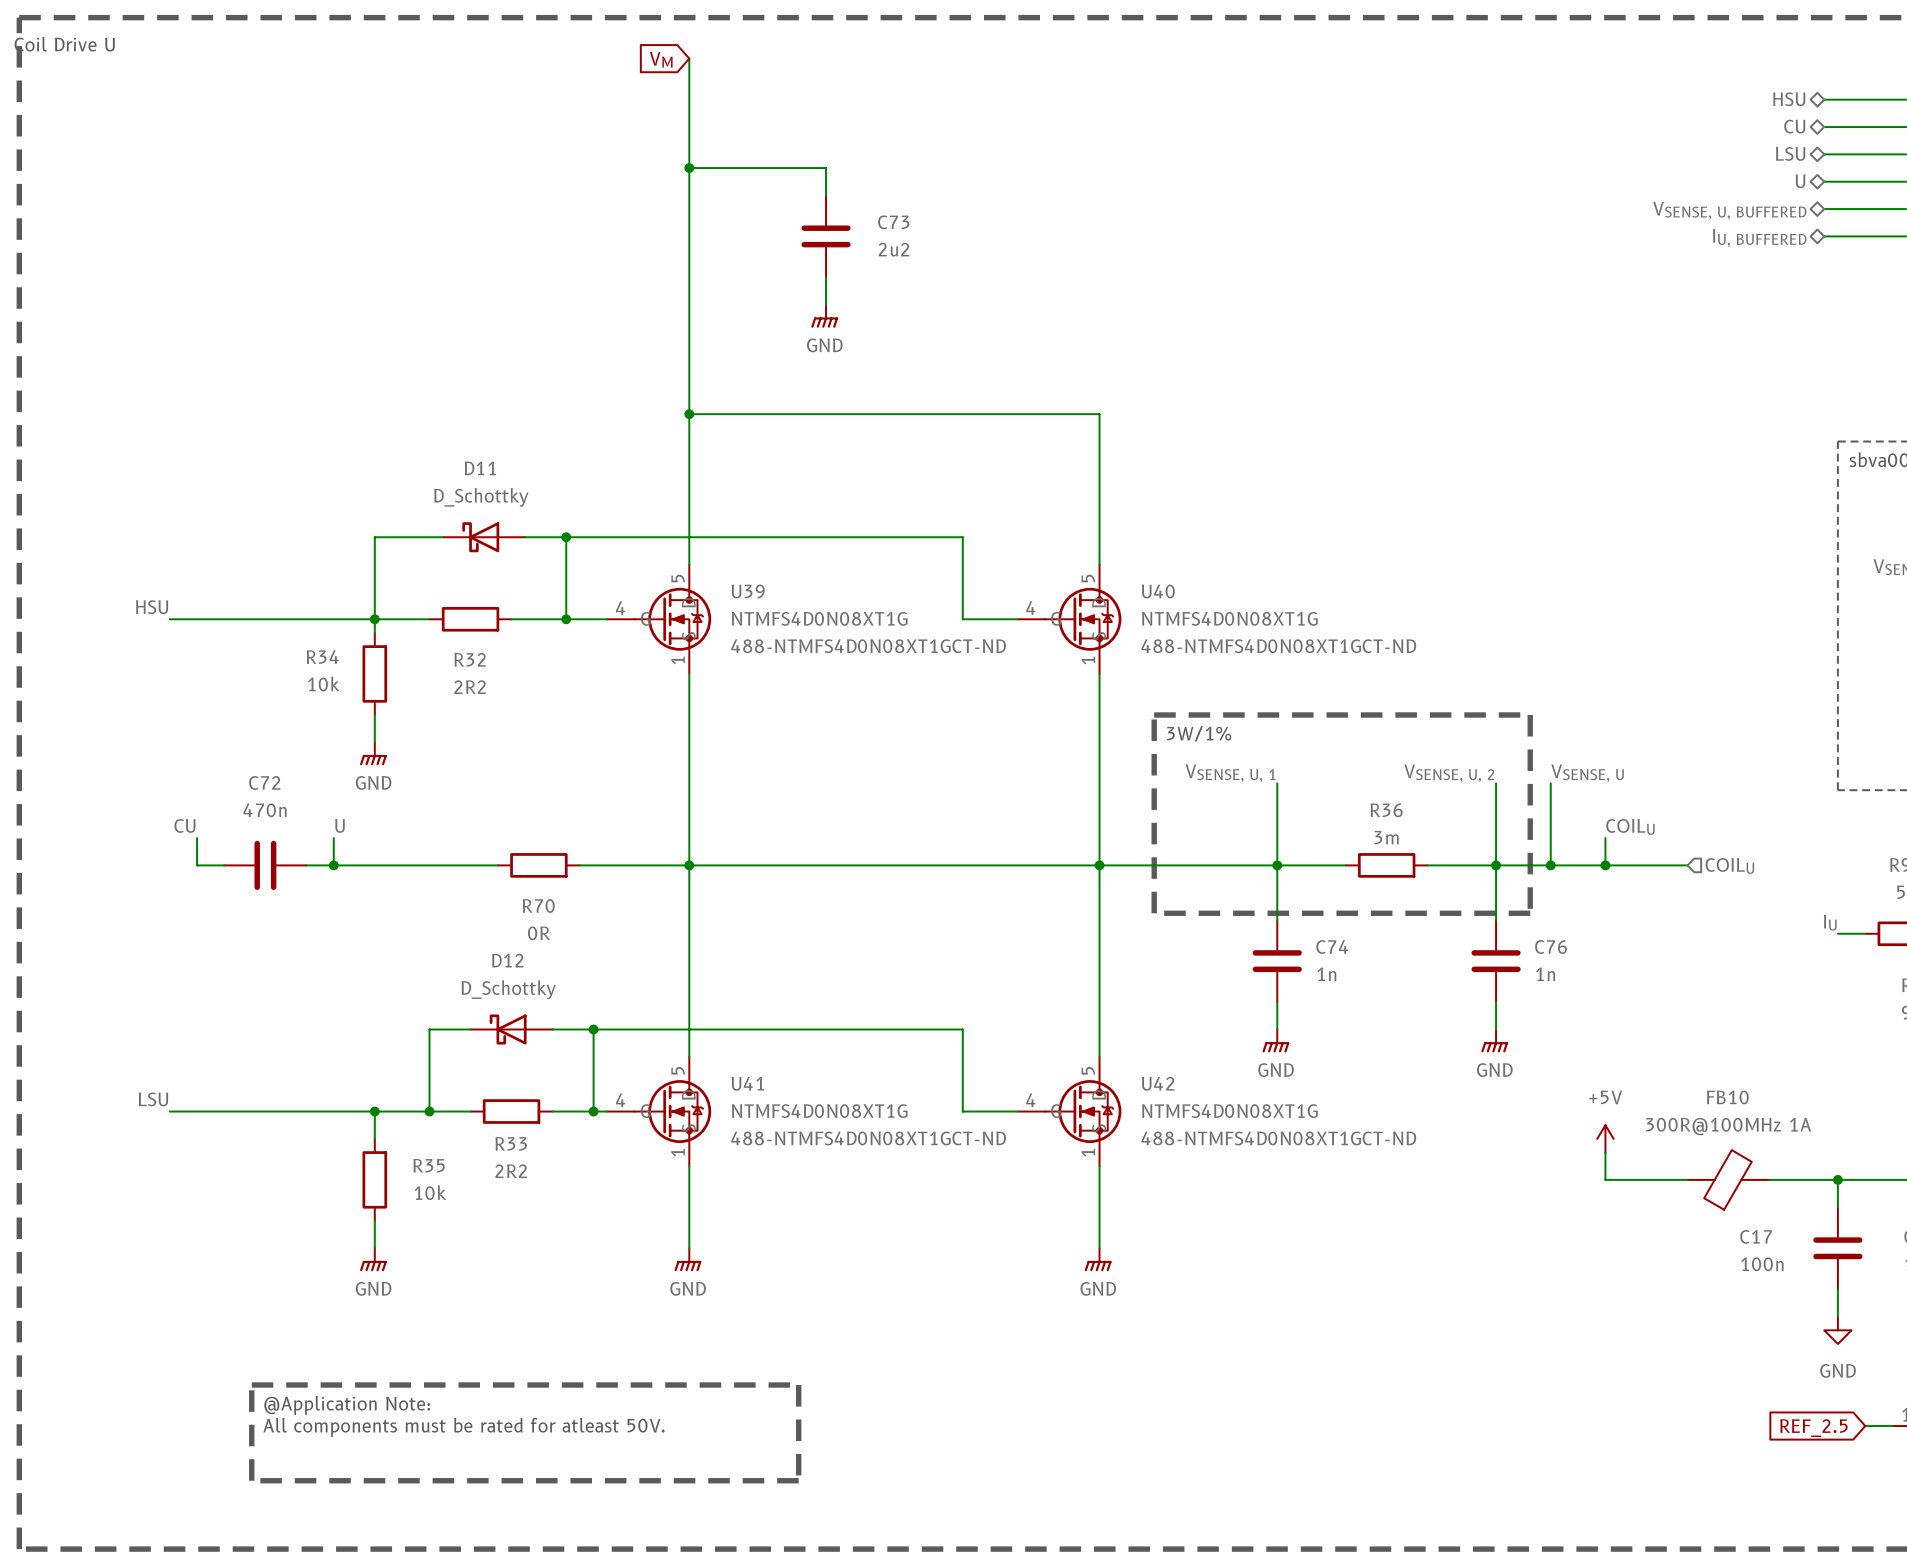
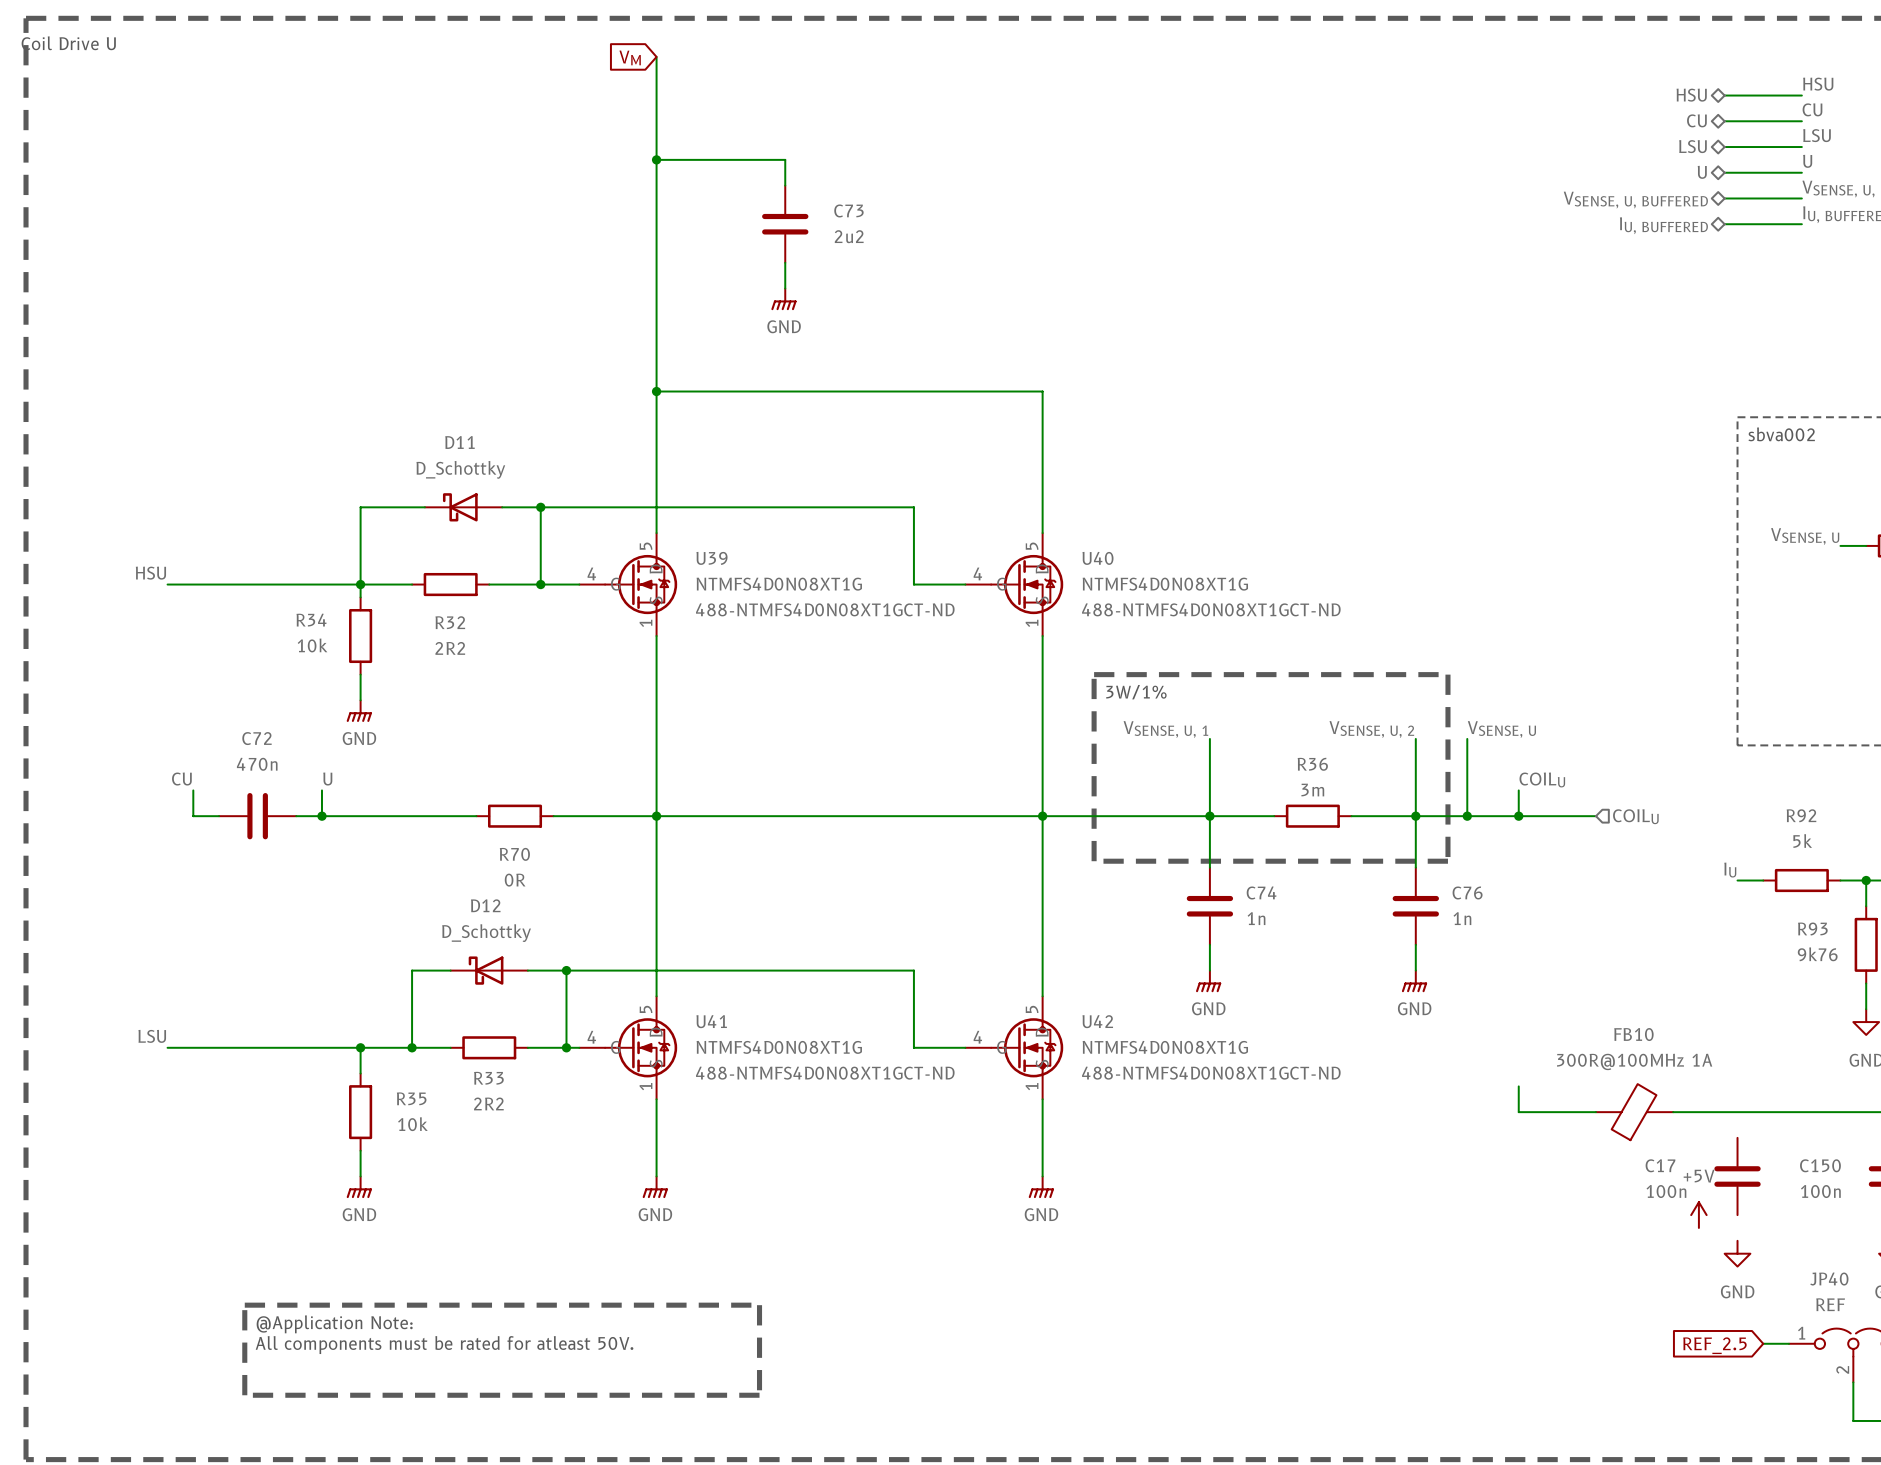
power symbol position: +5V (1605, 1138) -> +5V (1698, 1215)
wire: (1837, 1179) (1837, 1207) -> none
junction: (1837, 1179) -> none
wire: (1837, 1289) (1837, 1316) -> none

